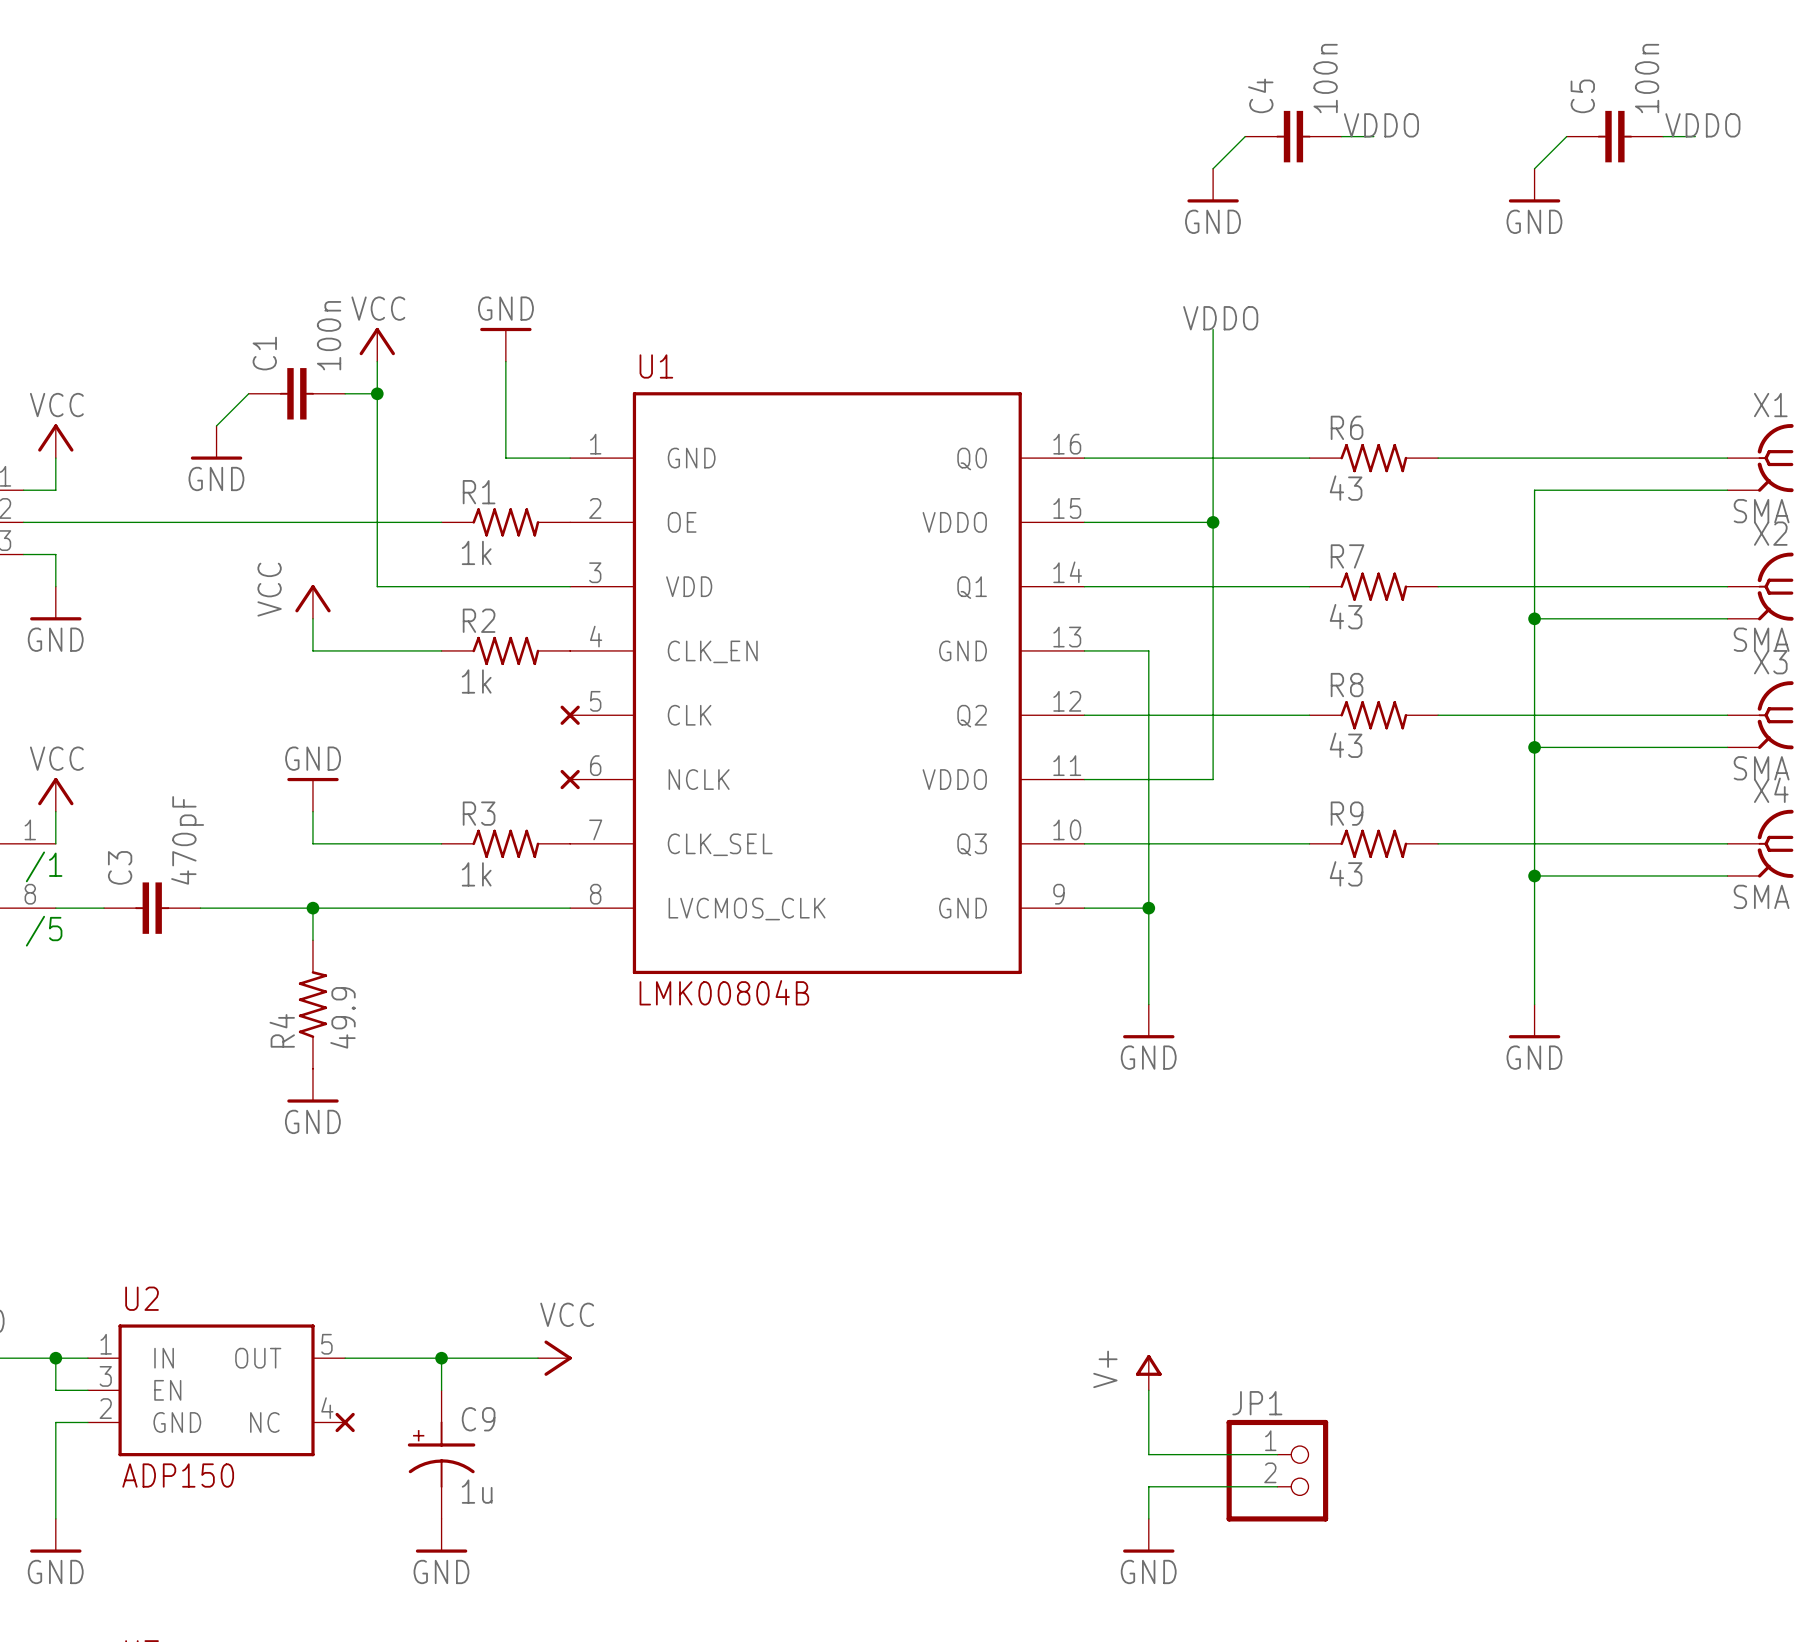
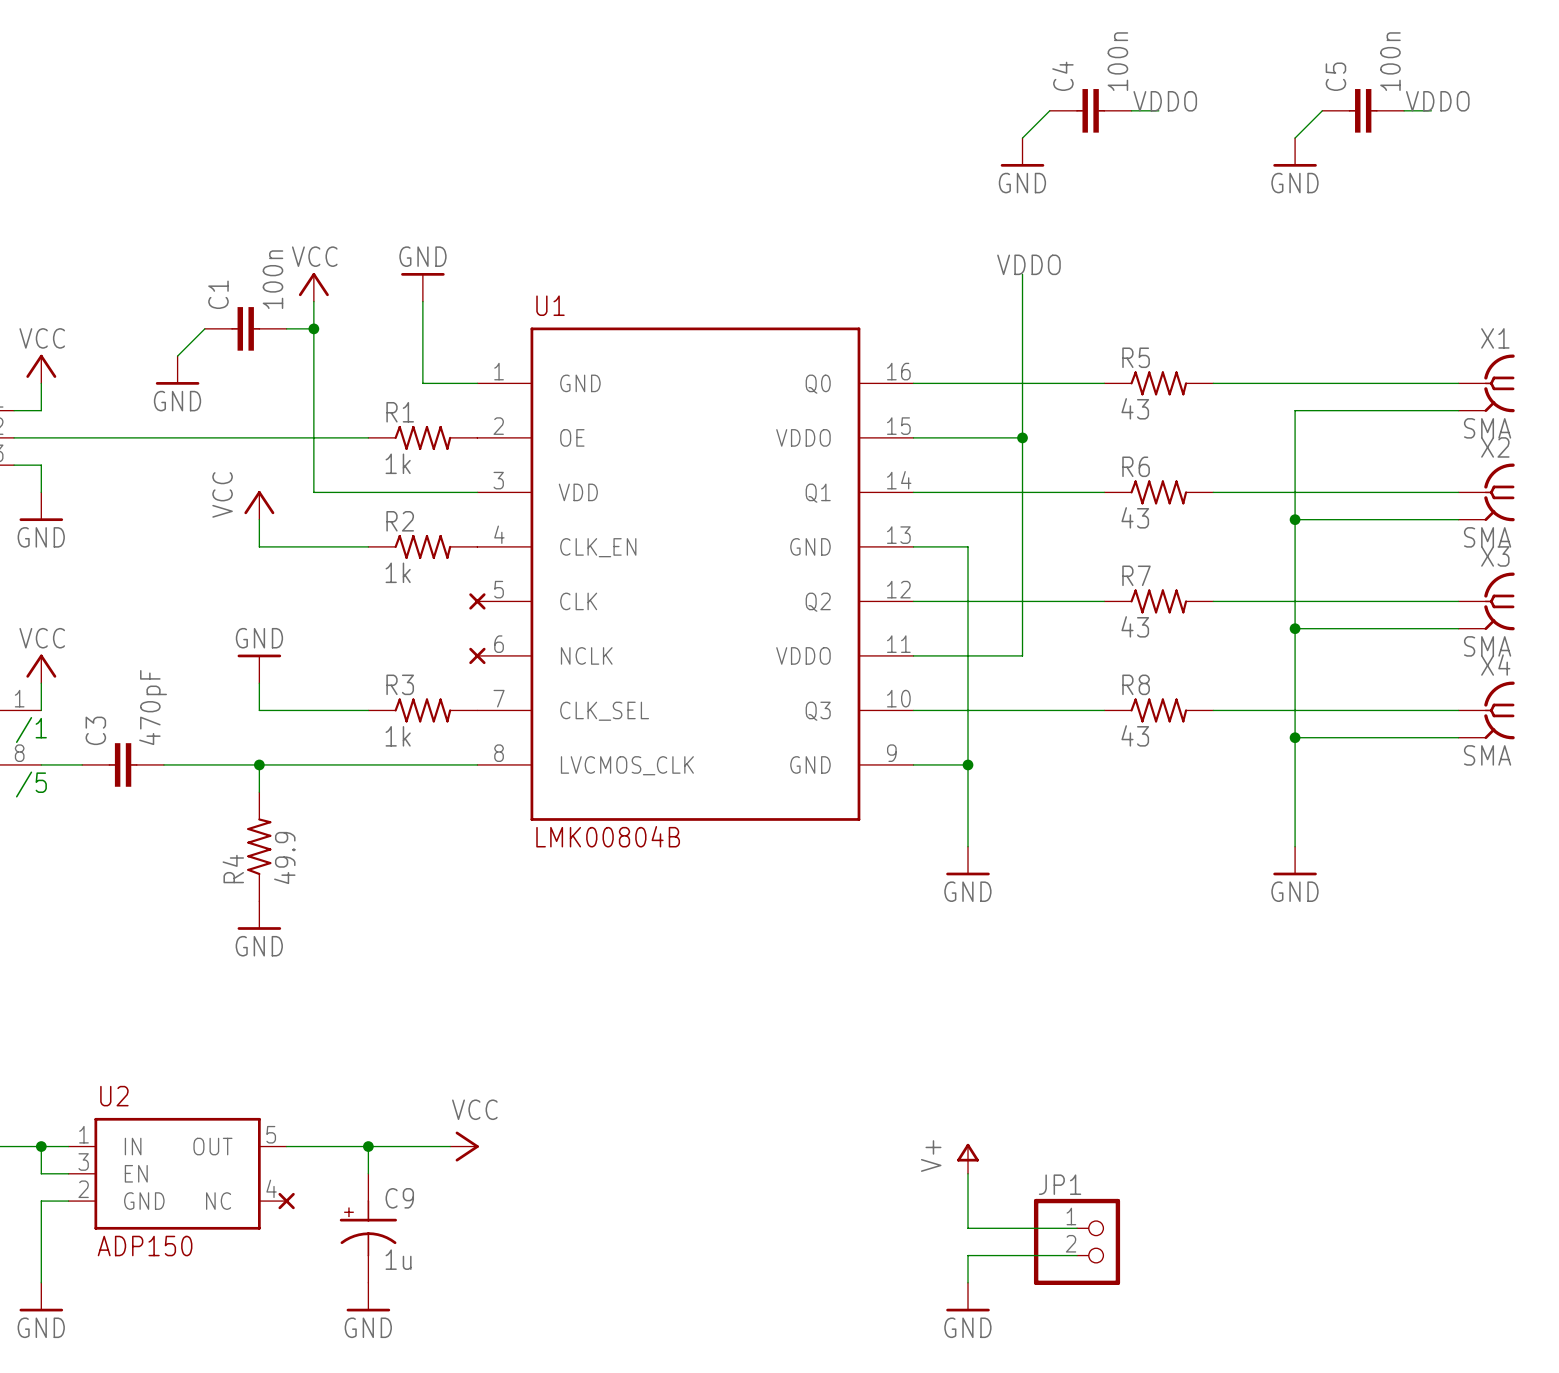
R6 name: R6 (1347, 427) -> R5 (1136, 357)
R7 name: R7 (1347, 556) -> R6 (1136, 466)
R8 name: R8 (1347, 685) -> R7 (1136, 575)
R9 name: R9 (1347, 813) -> R8 (1136, 684)

